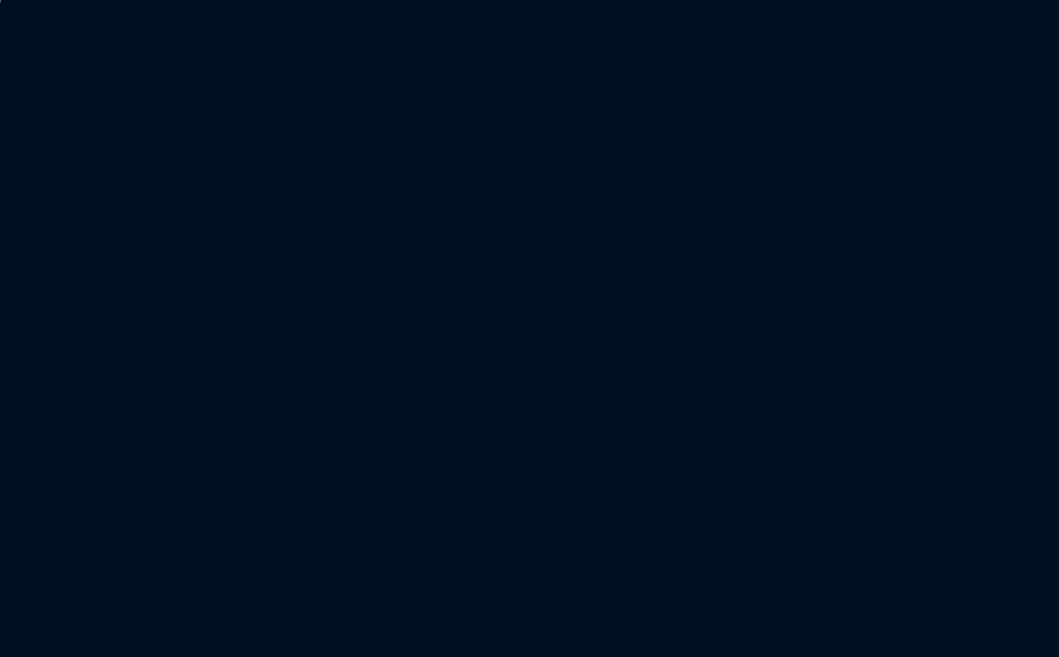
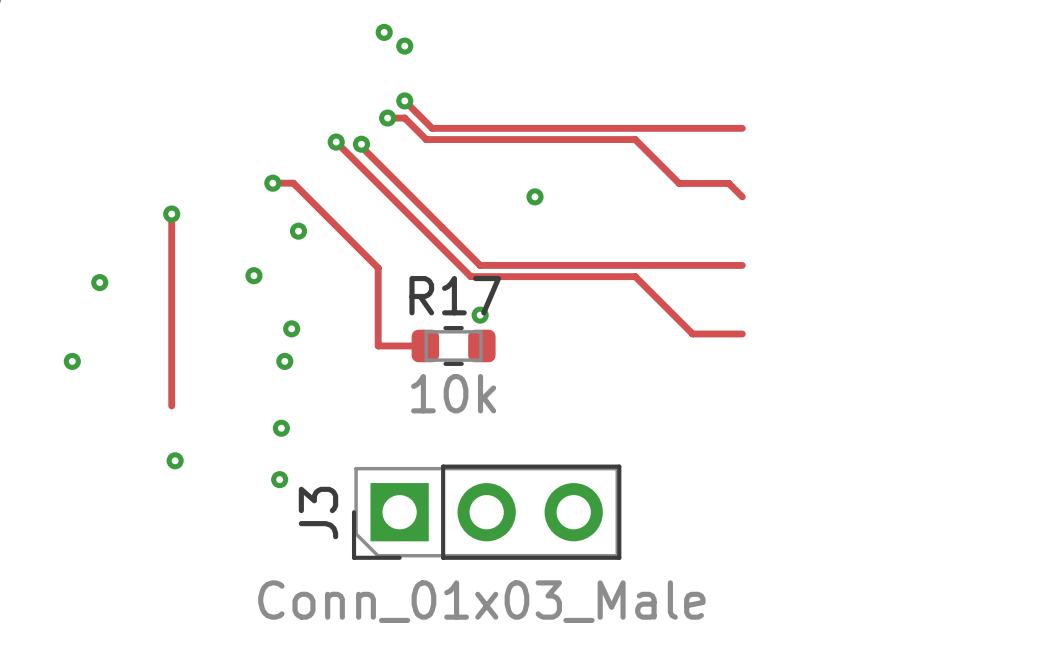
via: none -> (384, 32)
via: none -> (404, 46)
track: none -> (404, 100) (432, 128) (742, 128)
via: none -> (404, 100)
track: none -> (387, 118) (404, 118) (426, 139) (635, 139) (679, 183) (728, 183) (742, 196)
via: none -> (387, 118)
track: none -> (336, 142) (470, 276) (635, 276) (692, 333) (742, 333)
via: none -> (336, 142)
track: none -> (361, 144) (361, 146) (480, 265) (742, 265)
via: none -> (361, 144)
track: none -> (272, 183) (293, 183) (378, 268) (378, 345) (425, 345)
via: none -> (272, 183)
via: none -> (534, 196)
track: none -> (171, 214) (171, 405)
via: none -> (171, 214)
via: none -> (298, 231)
via: none -> (253, 275)
via: none -> (99, 282)
via: none -> (480, 315)
via: none -> (291, 328)
R17: none -> 10k (453, 345)
via: none -> (72, 361)
via: none -> (284, 361)
via: none -> (281, 428)
via: none -> (175, 460)
via: none -> (279, 479)
J3: none -> Conn_01x03_Male (486, 512)

